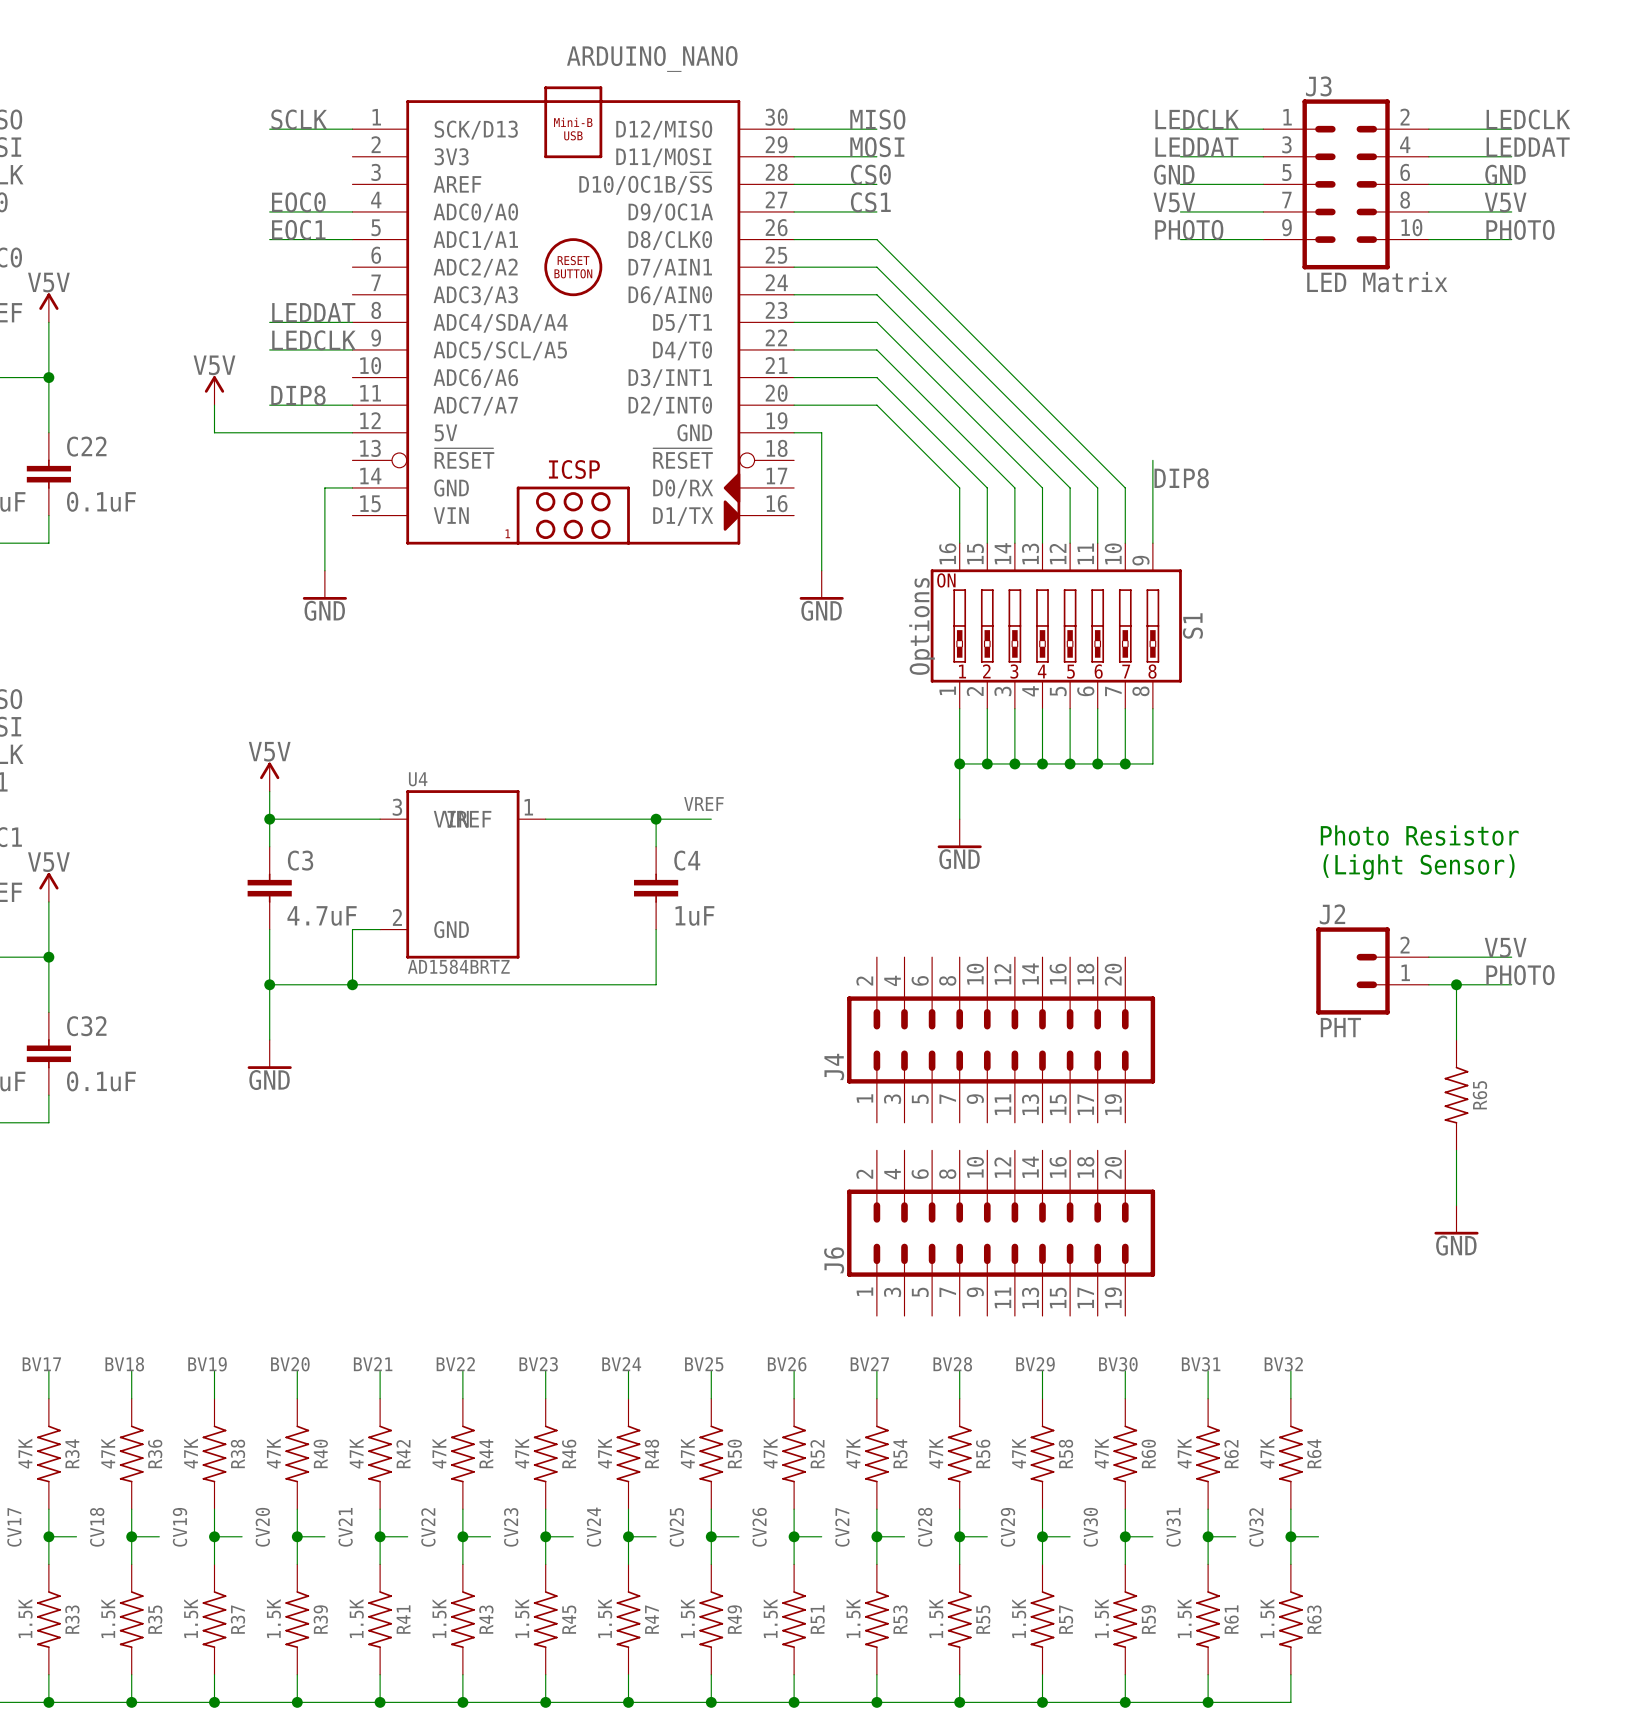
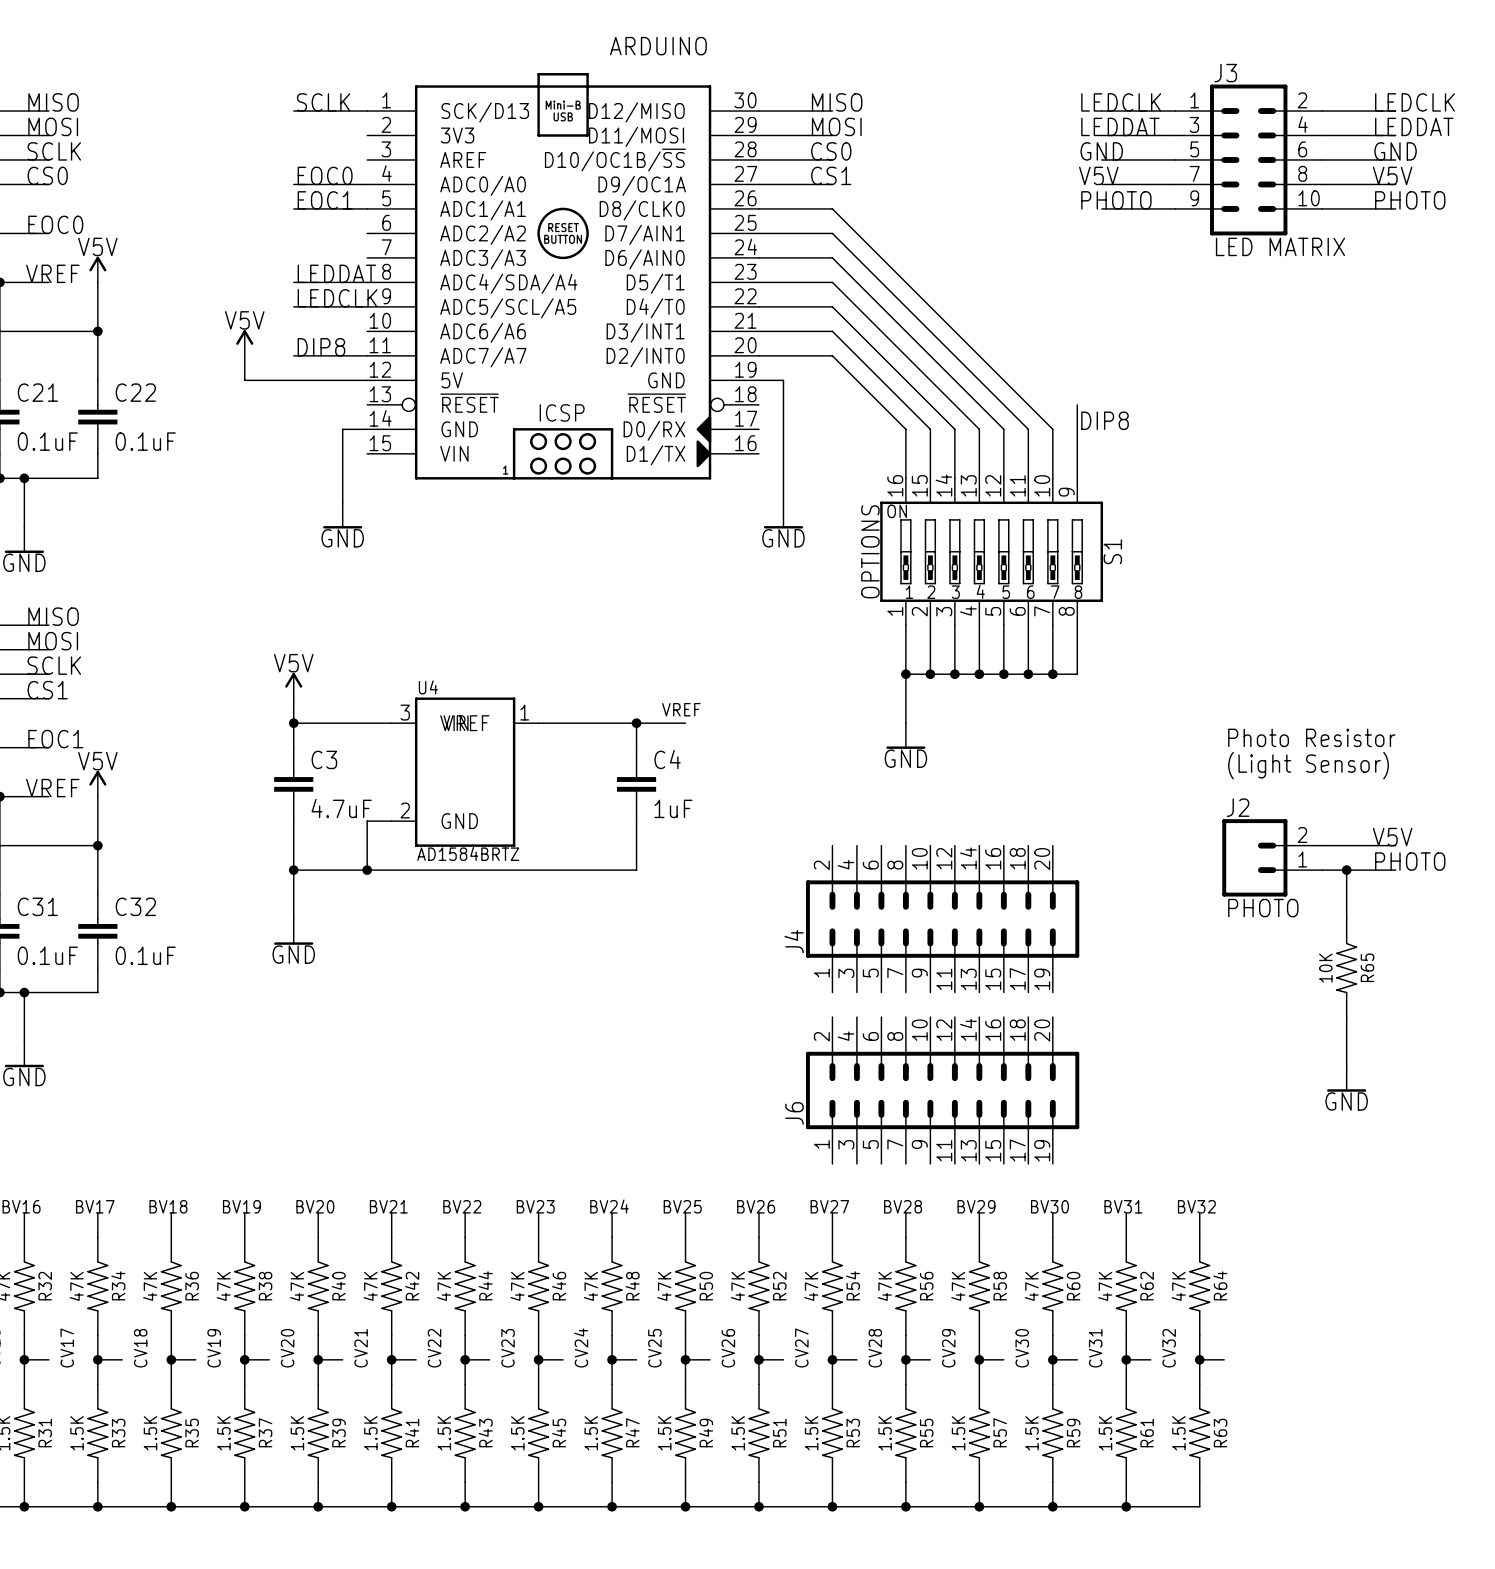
ARDUINO_NANO name: ARDUINO_NANO (652, 58) -> ARDUINO (658, 46)
J3 value: LED Matrix (1377, 282) -> LED MATRIX (1280, 246)
S1 value: Options (922, 626) -> OPTIONS (870, 551)
J2 value: PHT (1340, 1027) -> PHOTO (1263, 908)
R65 value: none -> 10K (1325, 968)

